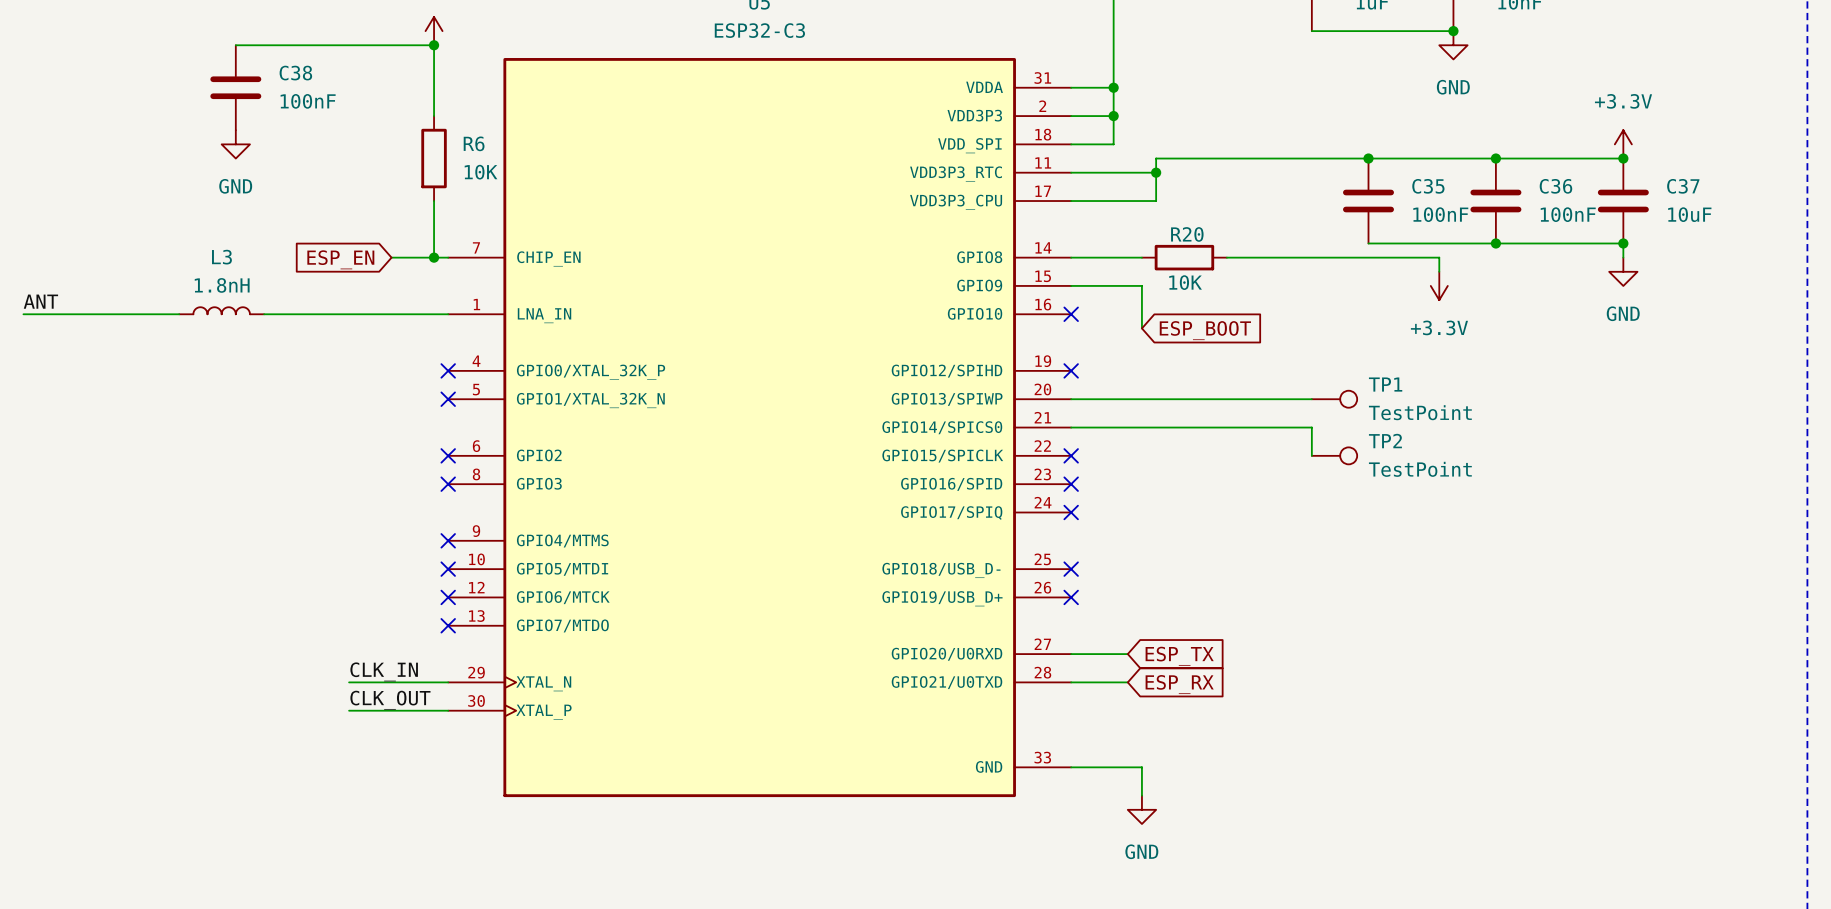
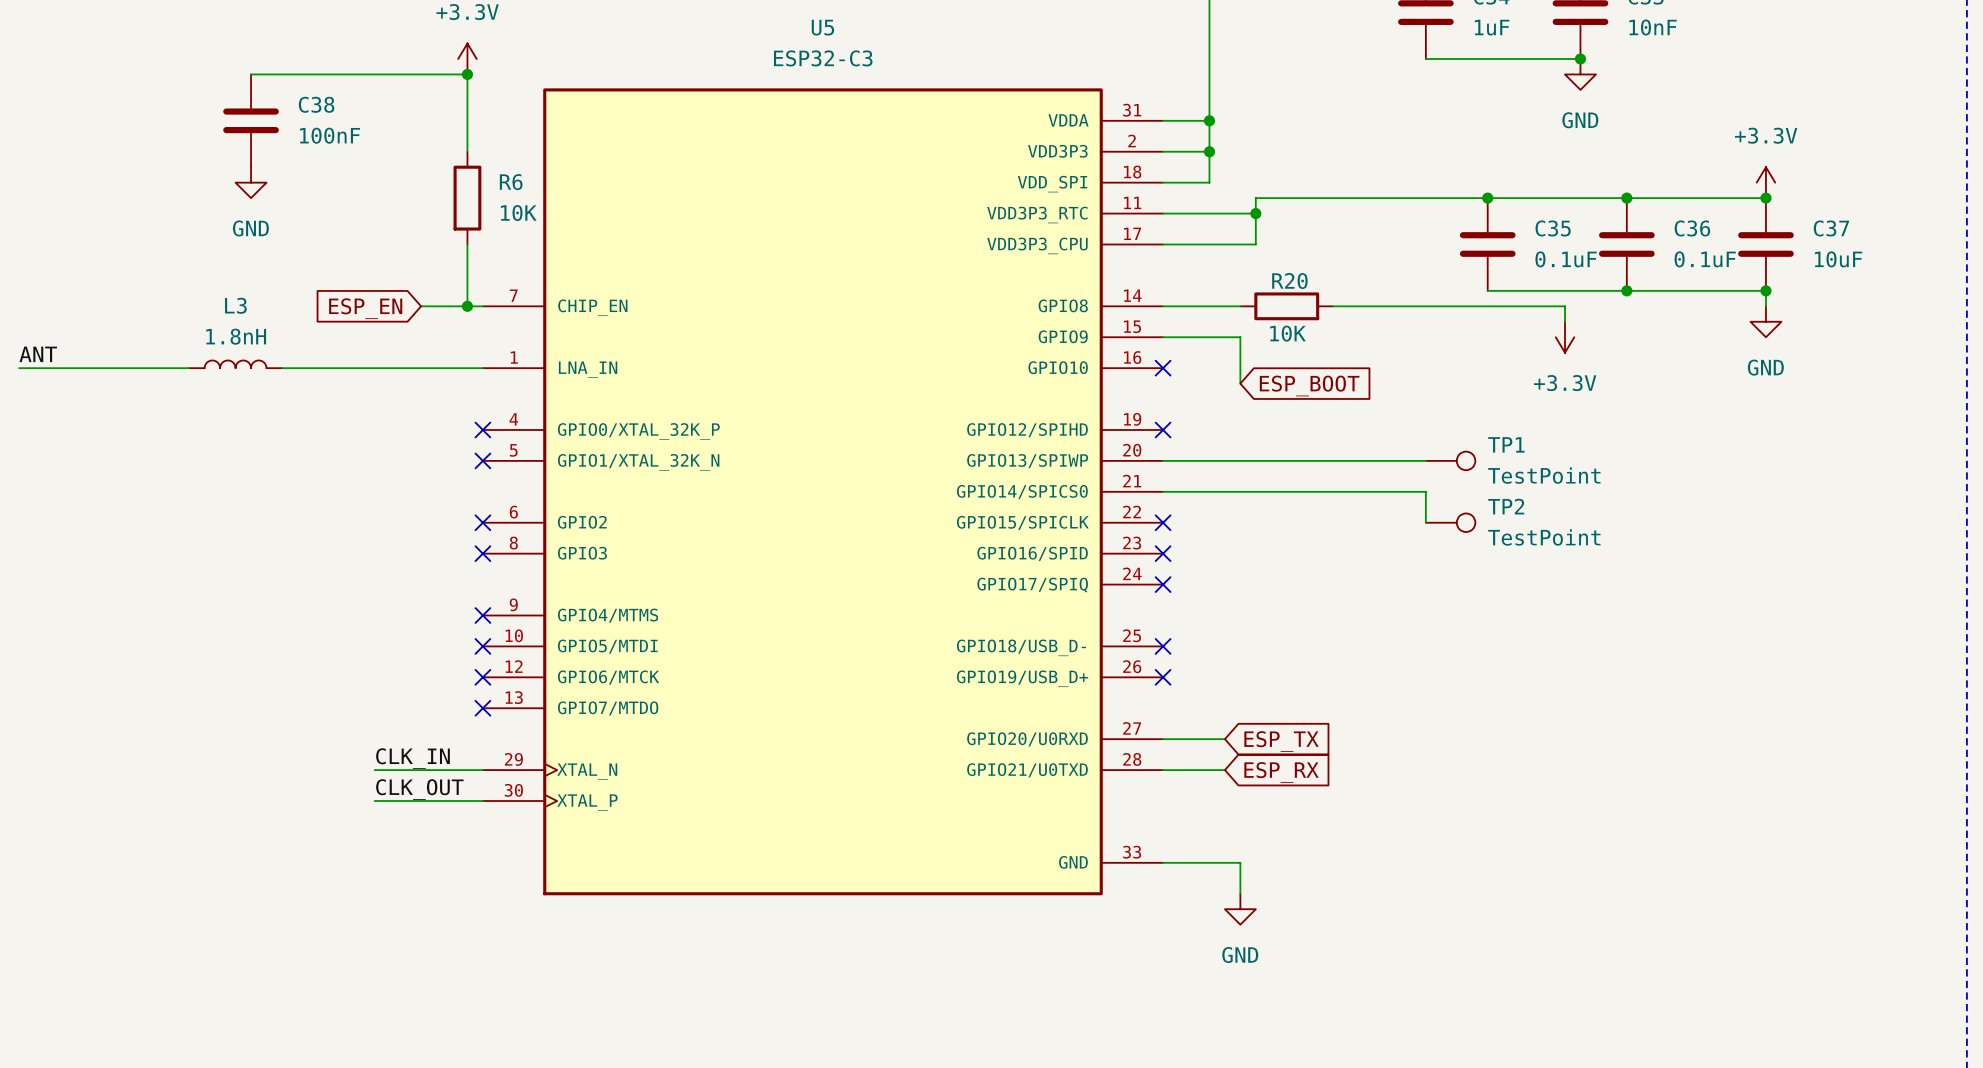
C35 value: 100nF (1440, 214) -> 0.1uF (1566, 259)
C36 value: 100nF (1568, 214) -> 0.1uF (1705, 259)

